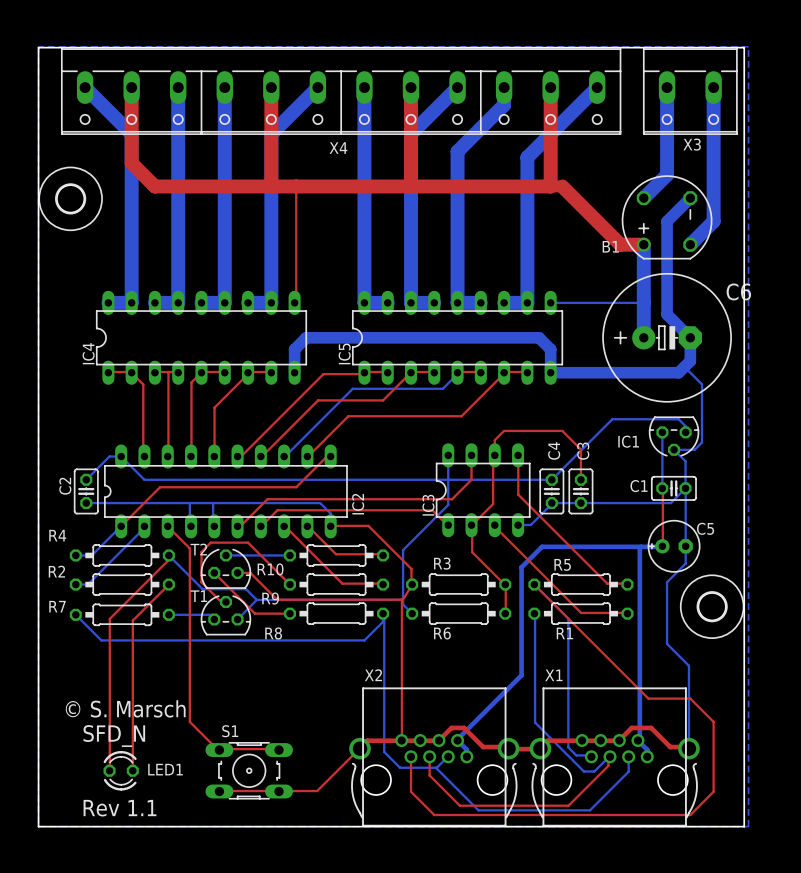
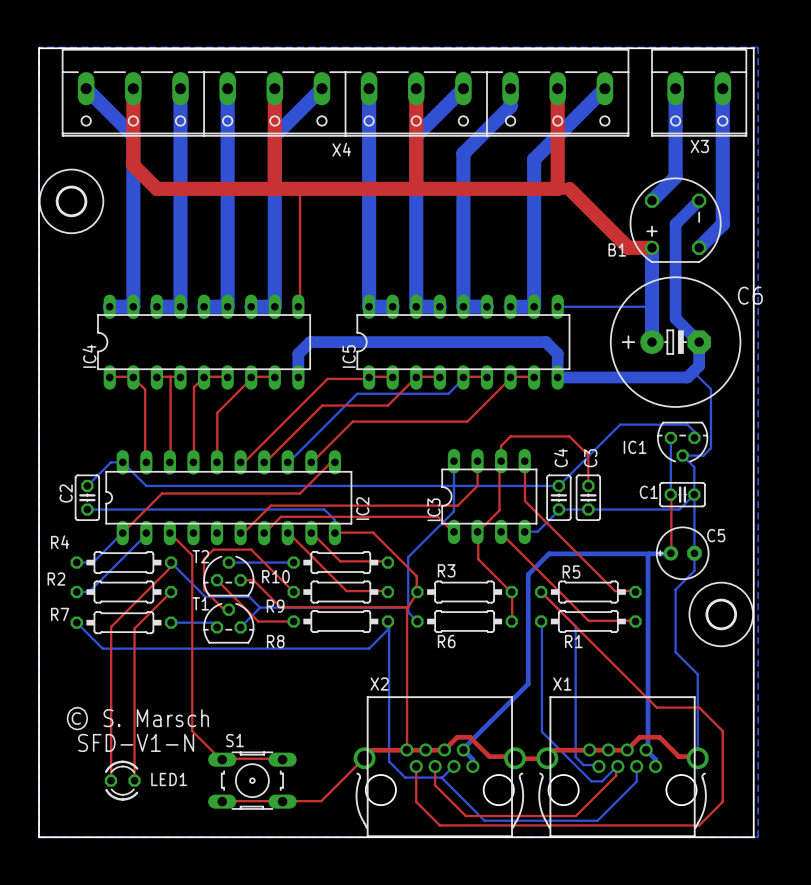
bottom track: (189, 503) (191, 526) -> none
bottom track: (213, 503) (214, 526) -> none
text: SFD_N (114, 736) -> SFD-V1-N (136, 742)
text: Rev 1.1 (119, 808) -> none

